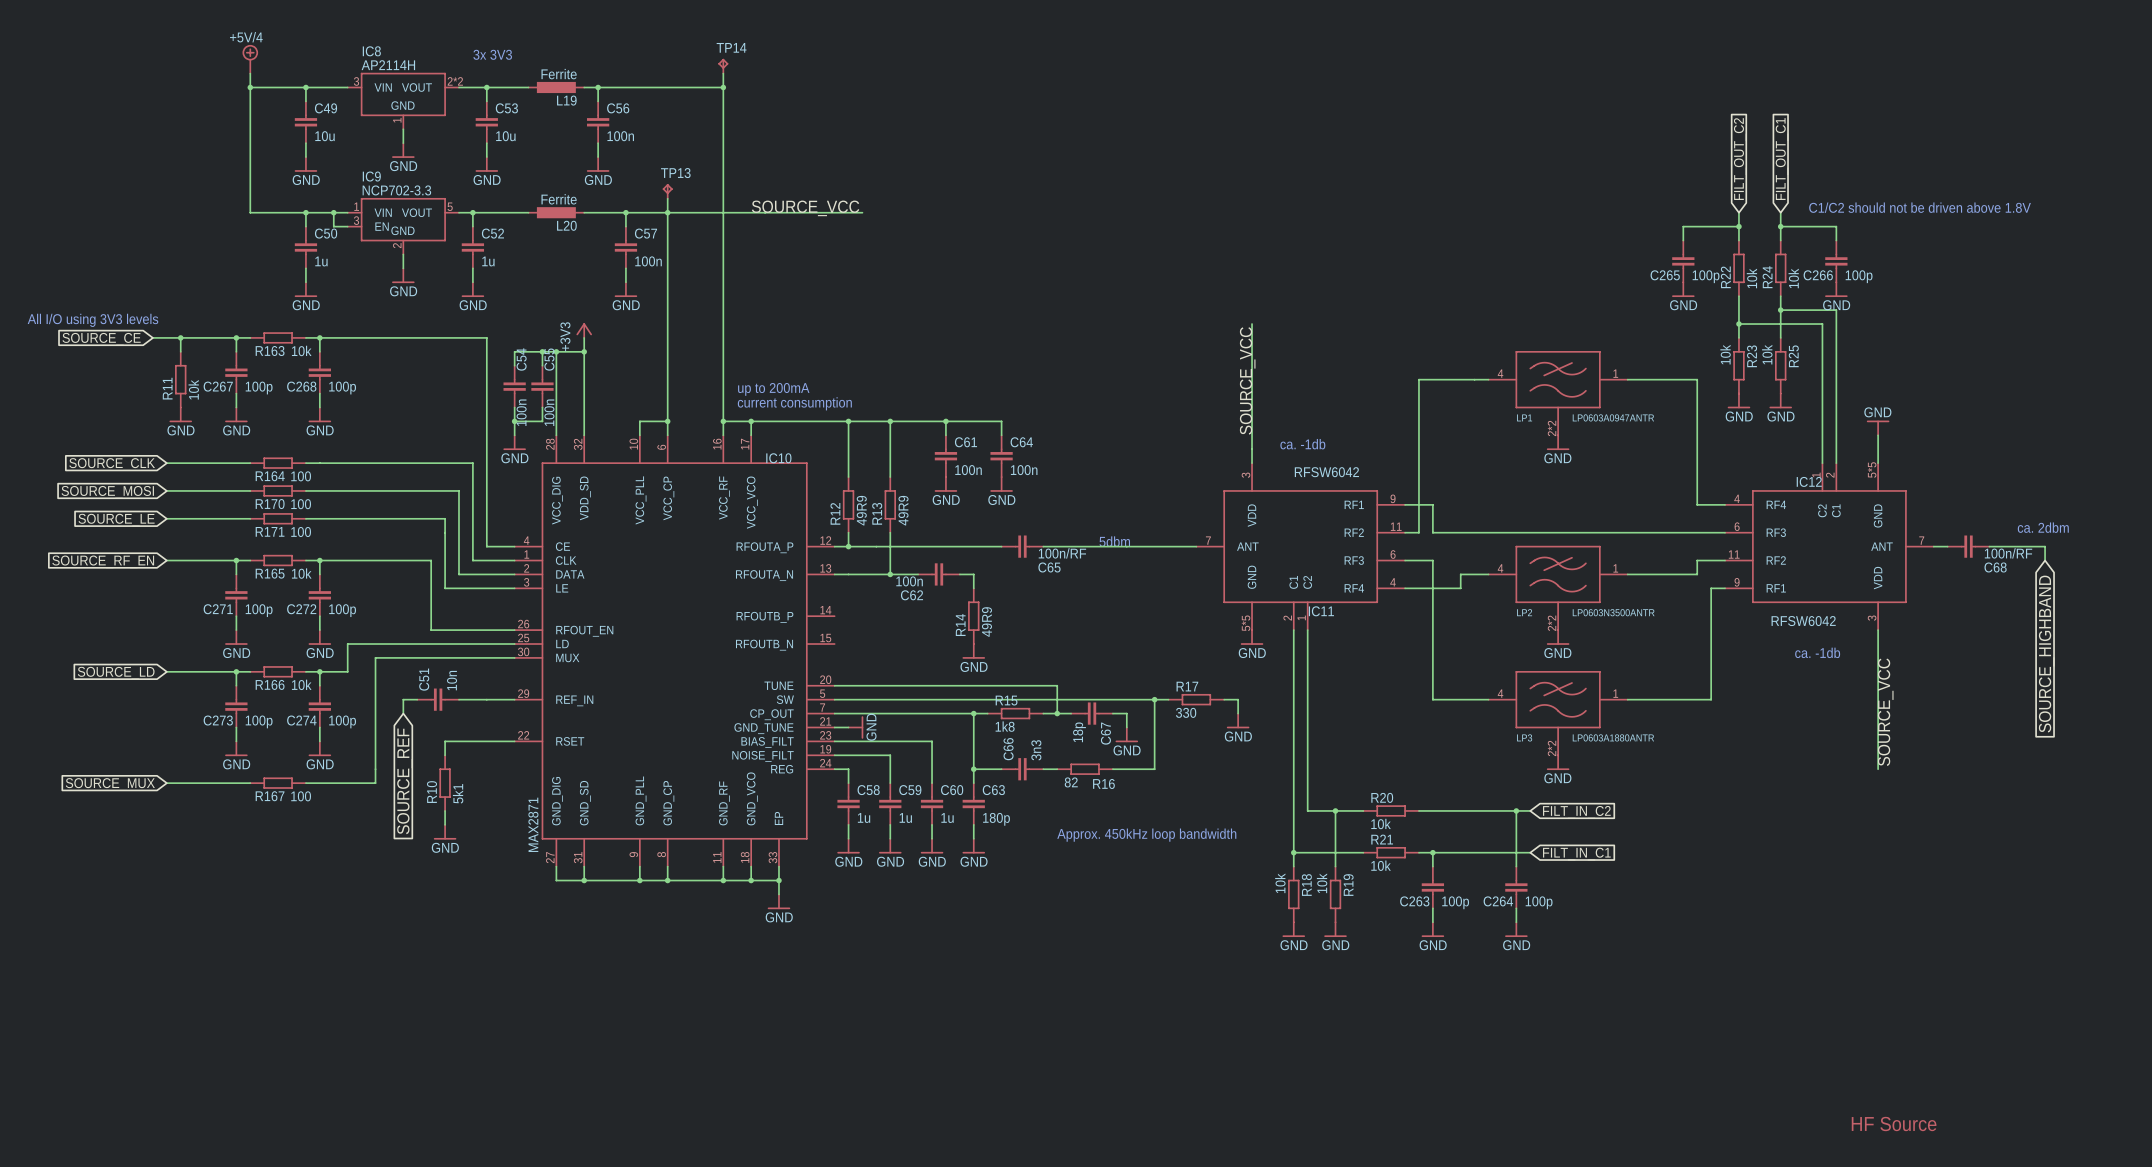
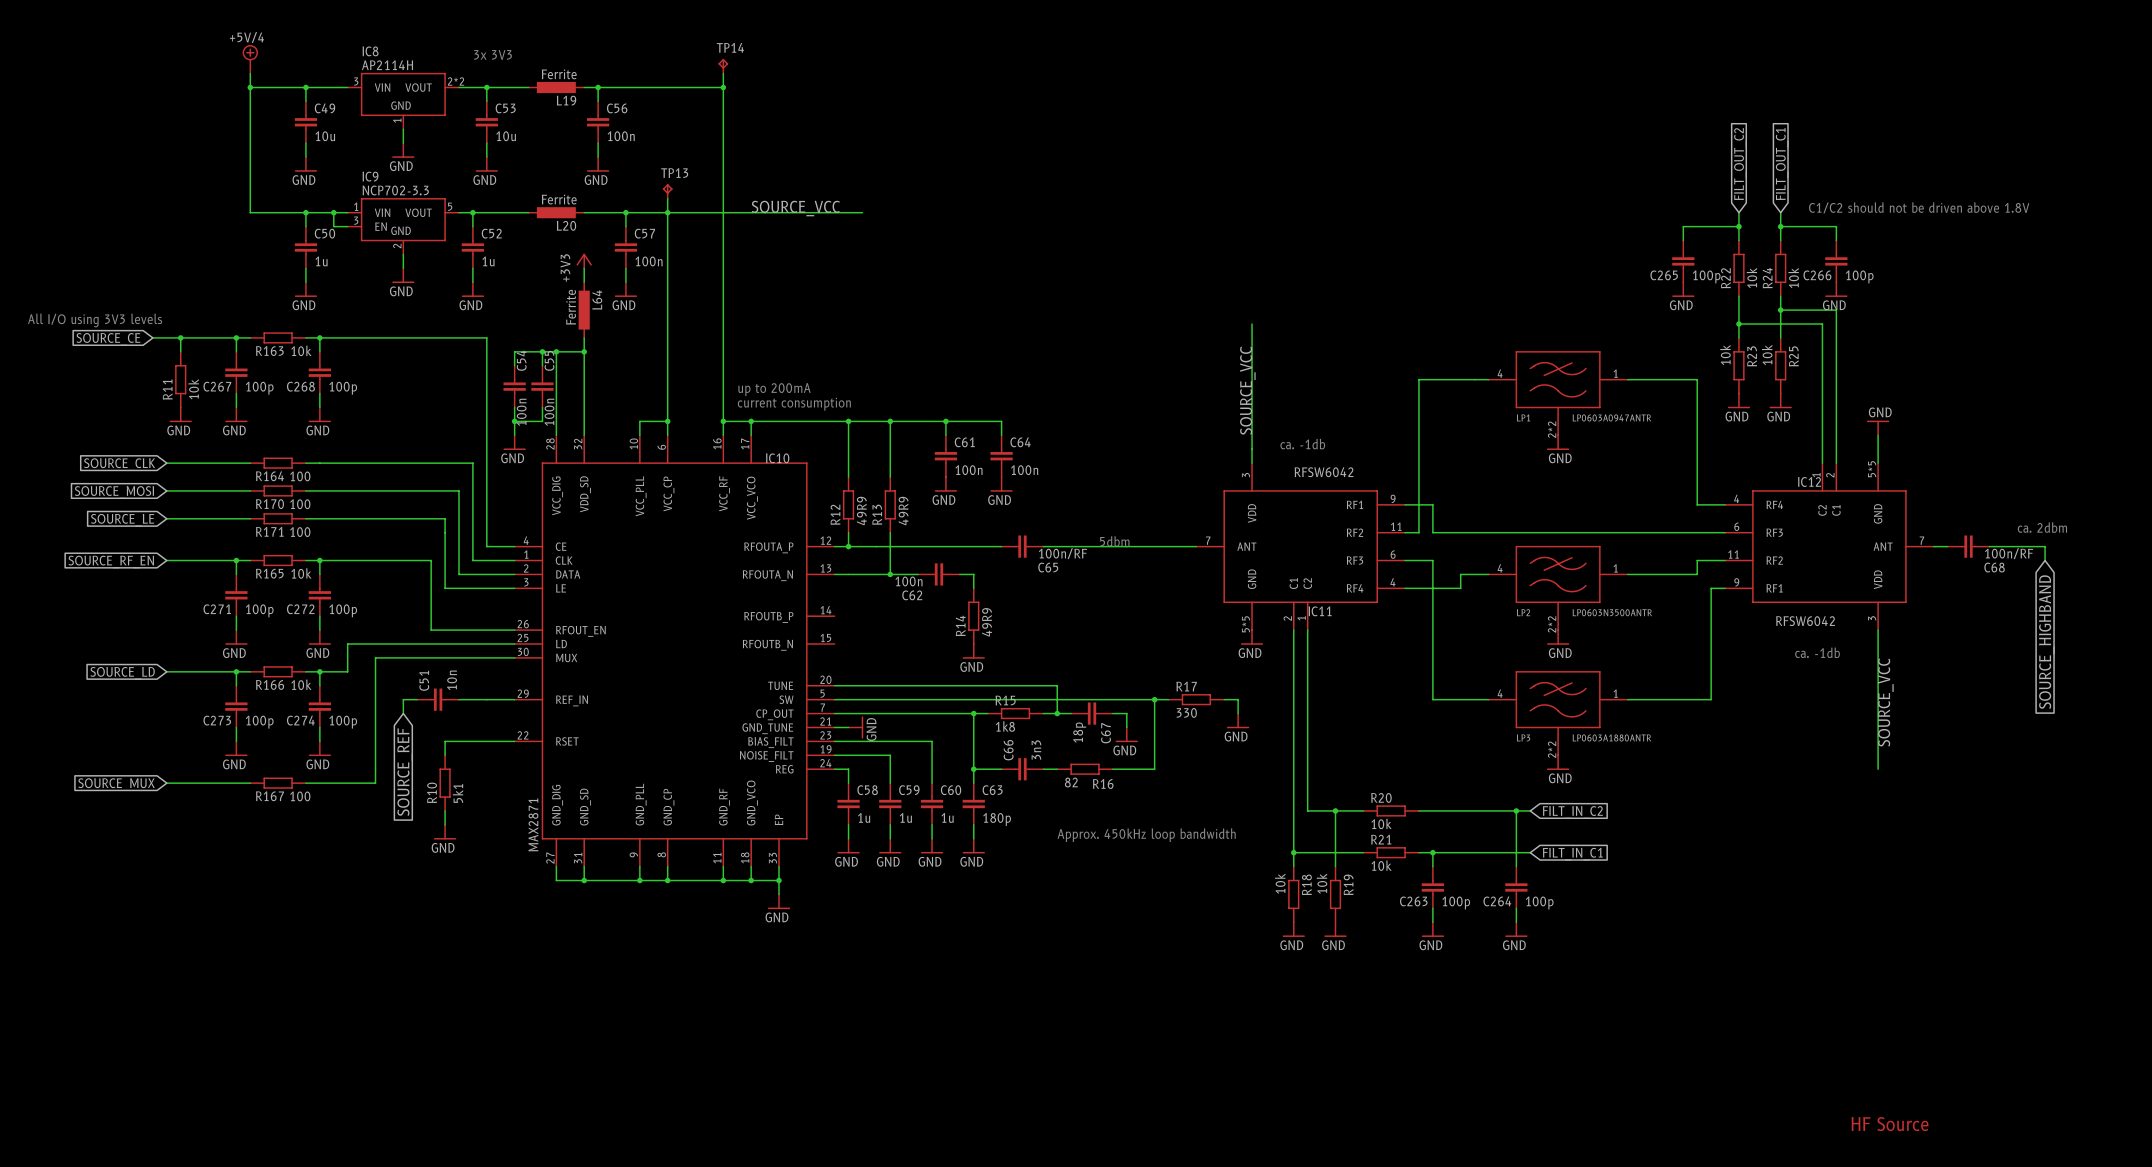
wire: none -> (584, 268) (584, 282)
L64: none -> Ferrite (584, 310)
power symbol position: +3V3 (584, 330) -> +3V3 (584, 261)

